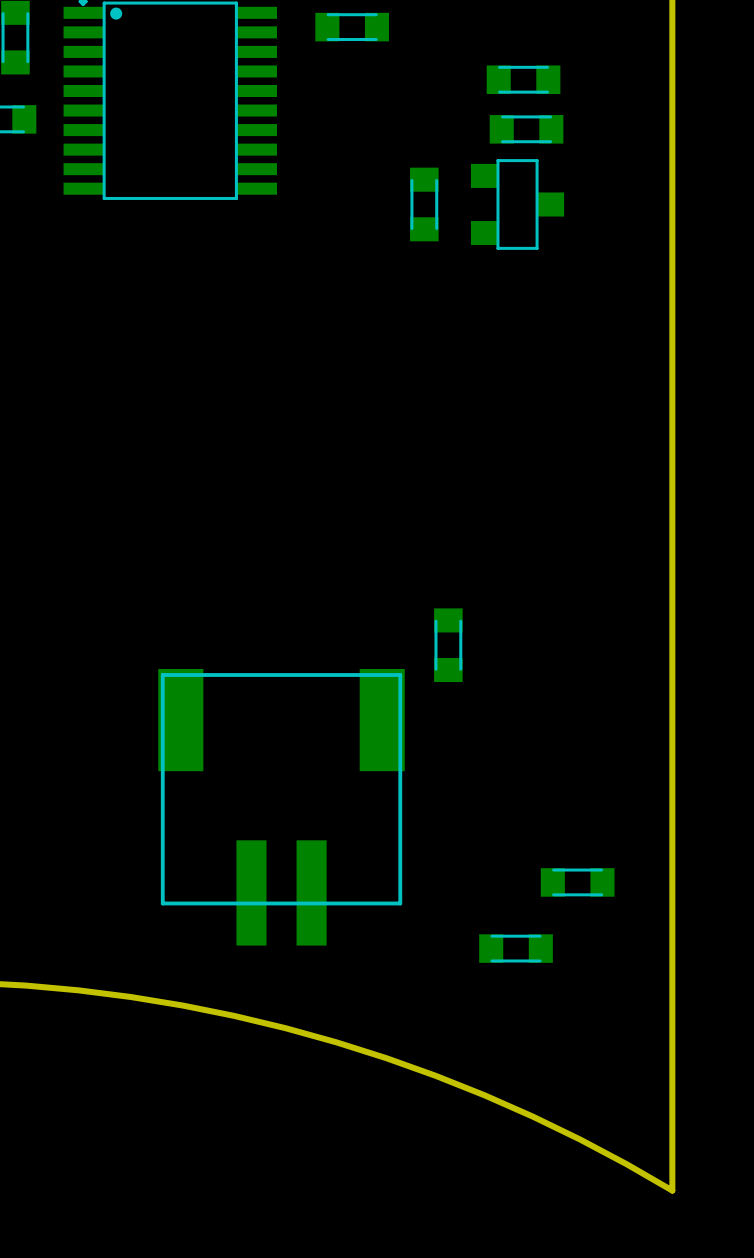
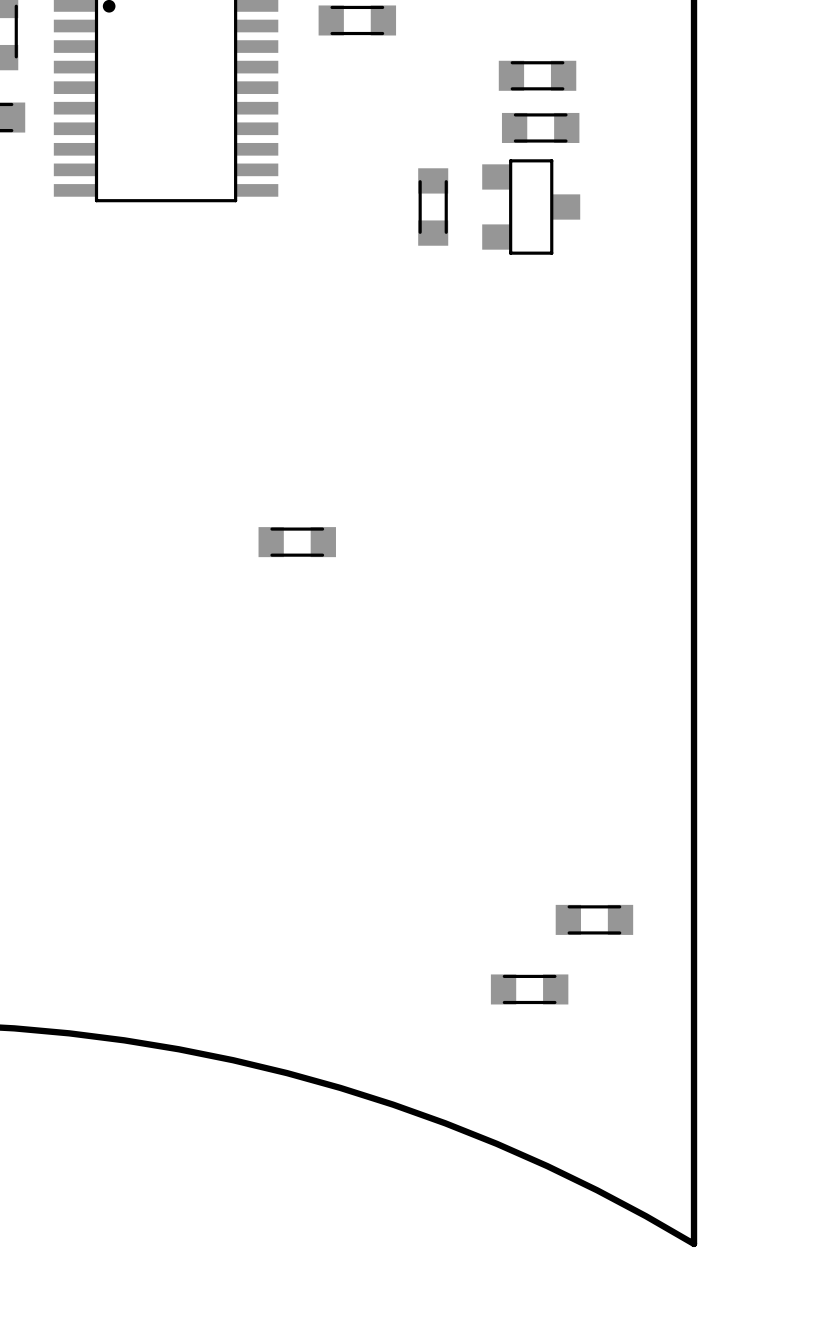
part rotation: 0° (448, 645) -> 90° clockwise (297, 542)
part position: (448, 645) -> (297, 542)
part: (281, 807) -> none

